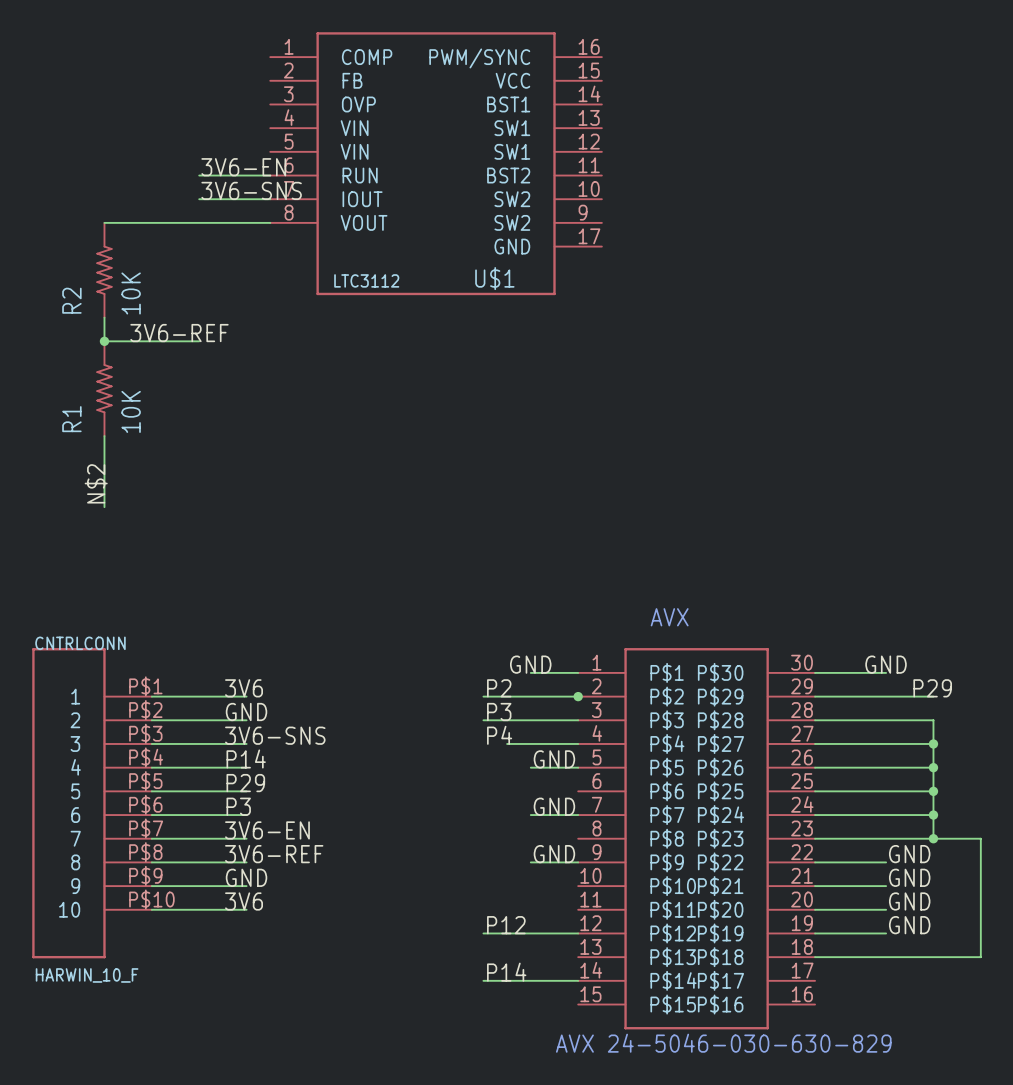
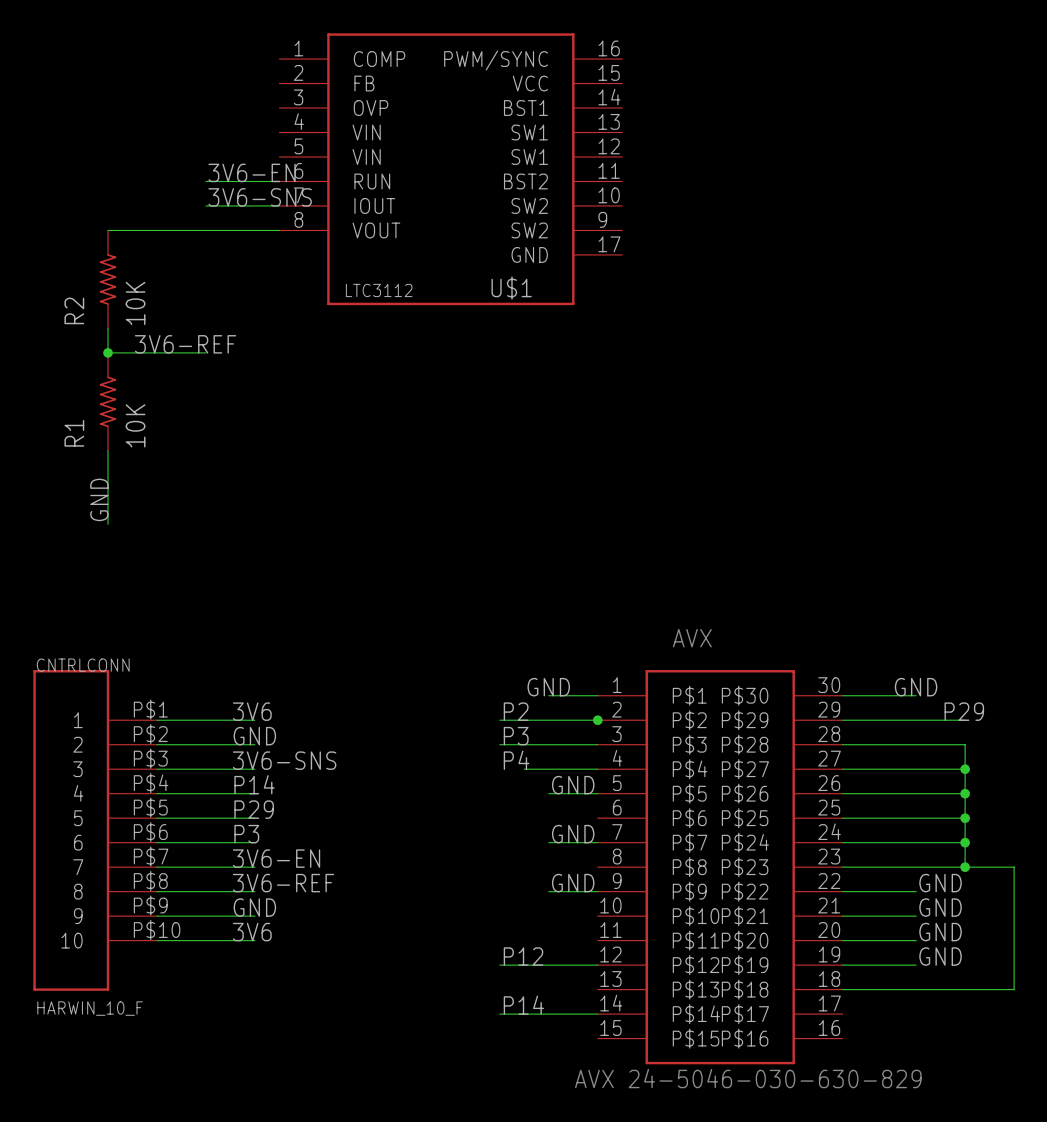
label: N$2 (96, 483) -> GND (99, 499)

